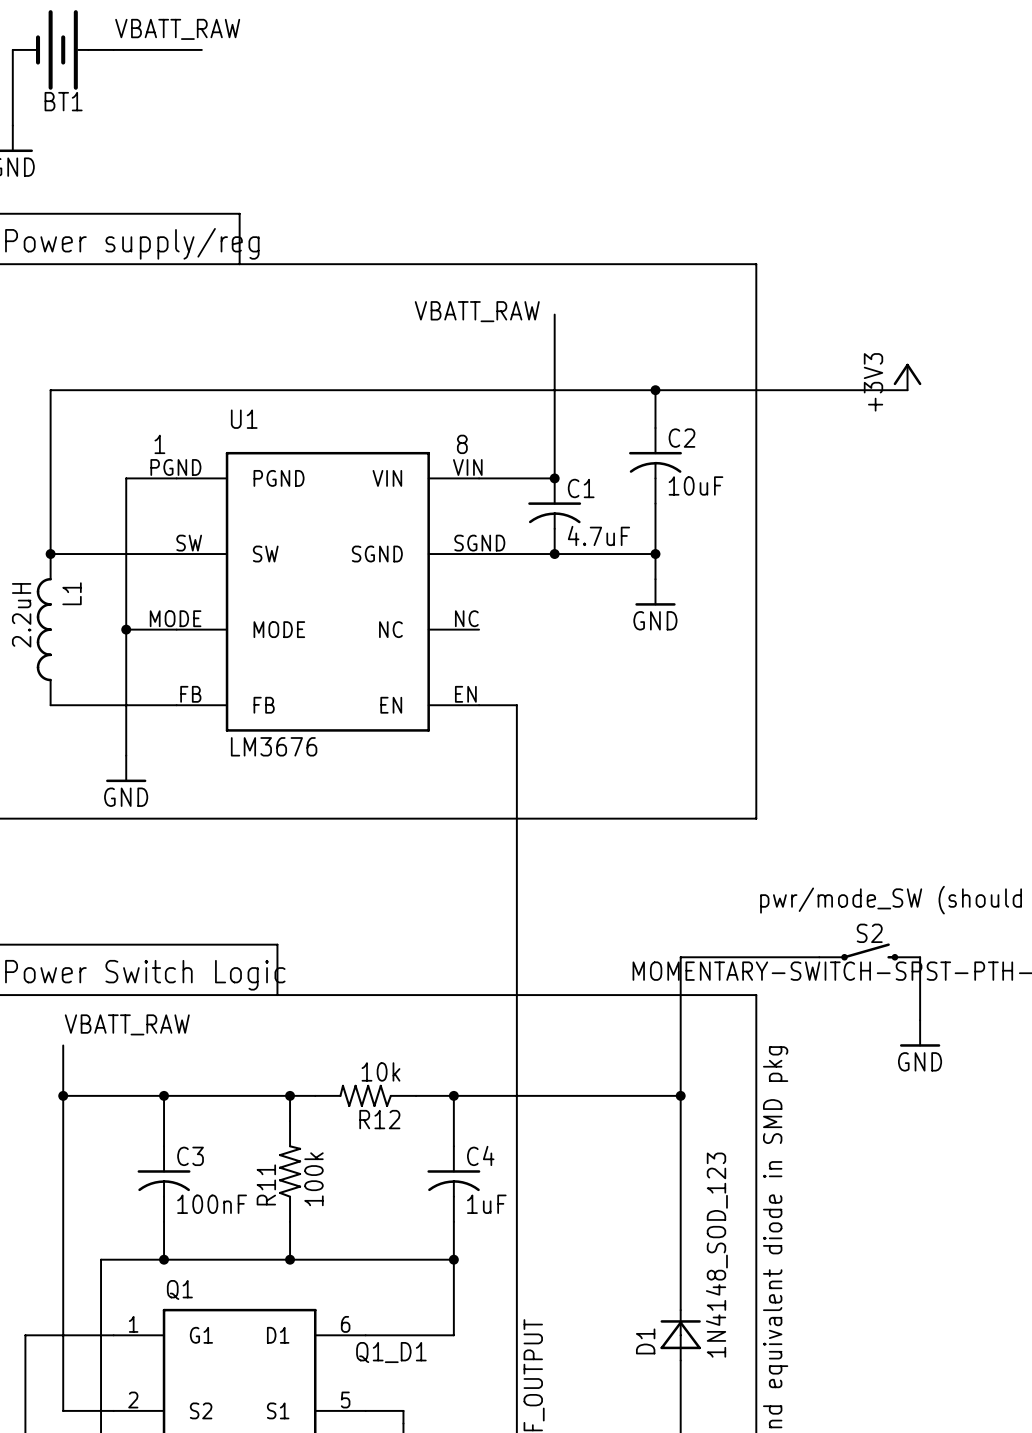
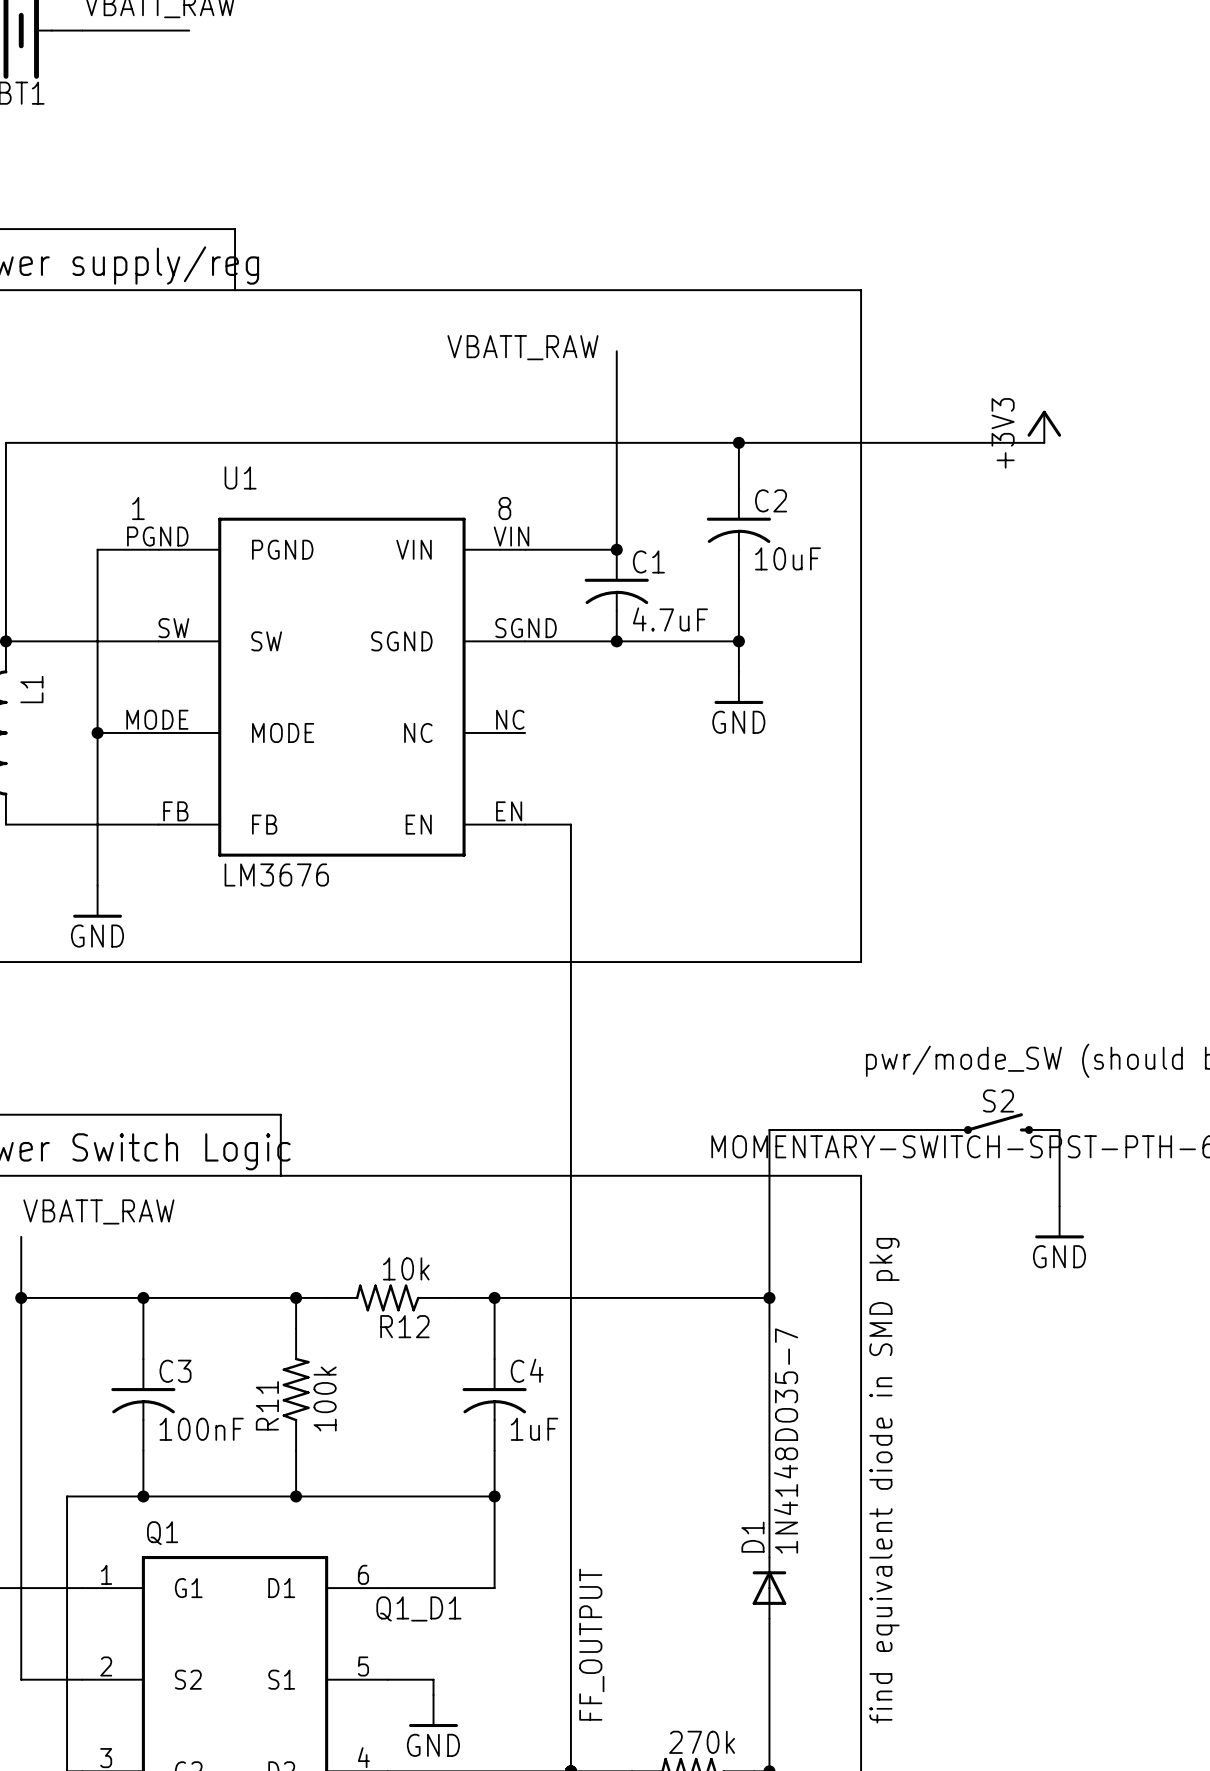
D1 value: 1N4148_SOD_123 (716, 1255) -> 1N4148DO35-7 (786, 1440)
D1 symbol: [660, 1310, 701, 1361] -> [752, 1557, 787, 1619]
D1 name position: D1 (645, 1341) -> D1 (752, 1537)

